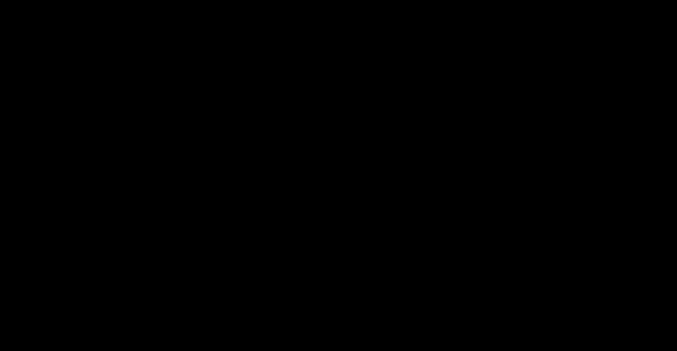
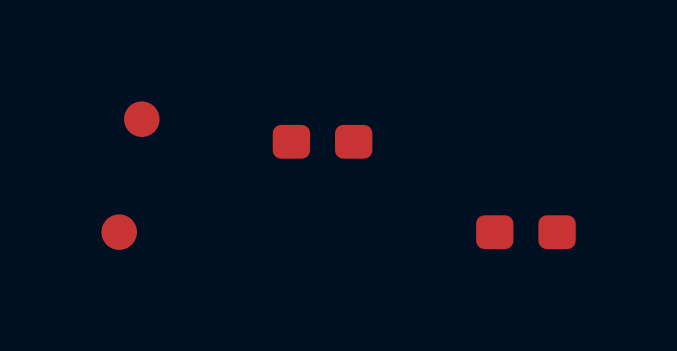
part: none -> (141, 119)
part: none -> (322, 141)
part: none -> (119, 232)
part: none -> (525, 232)

